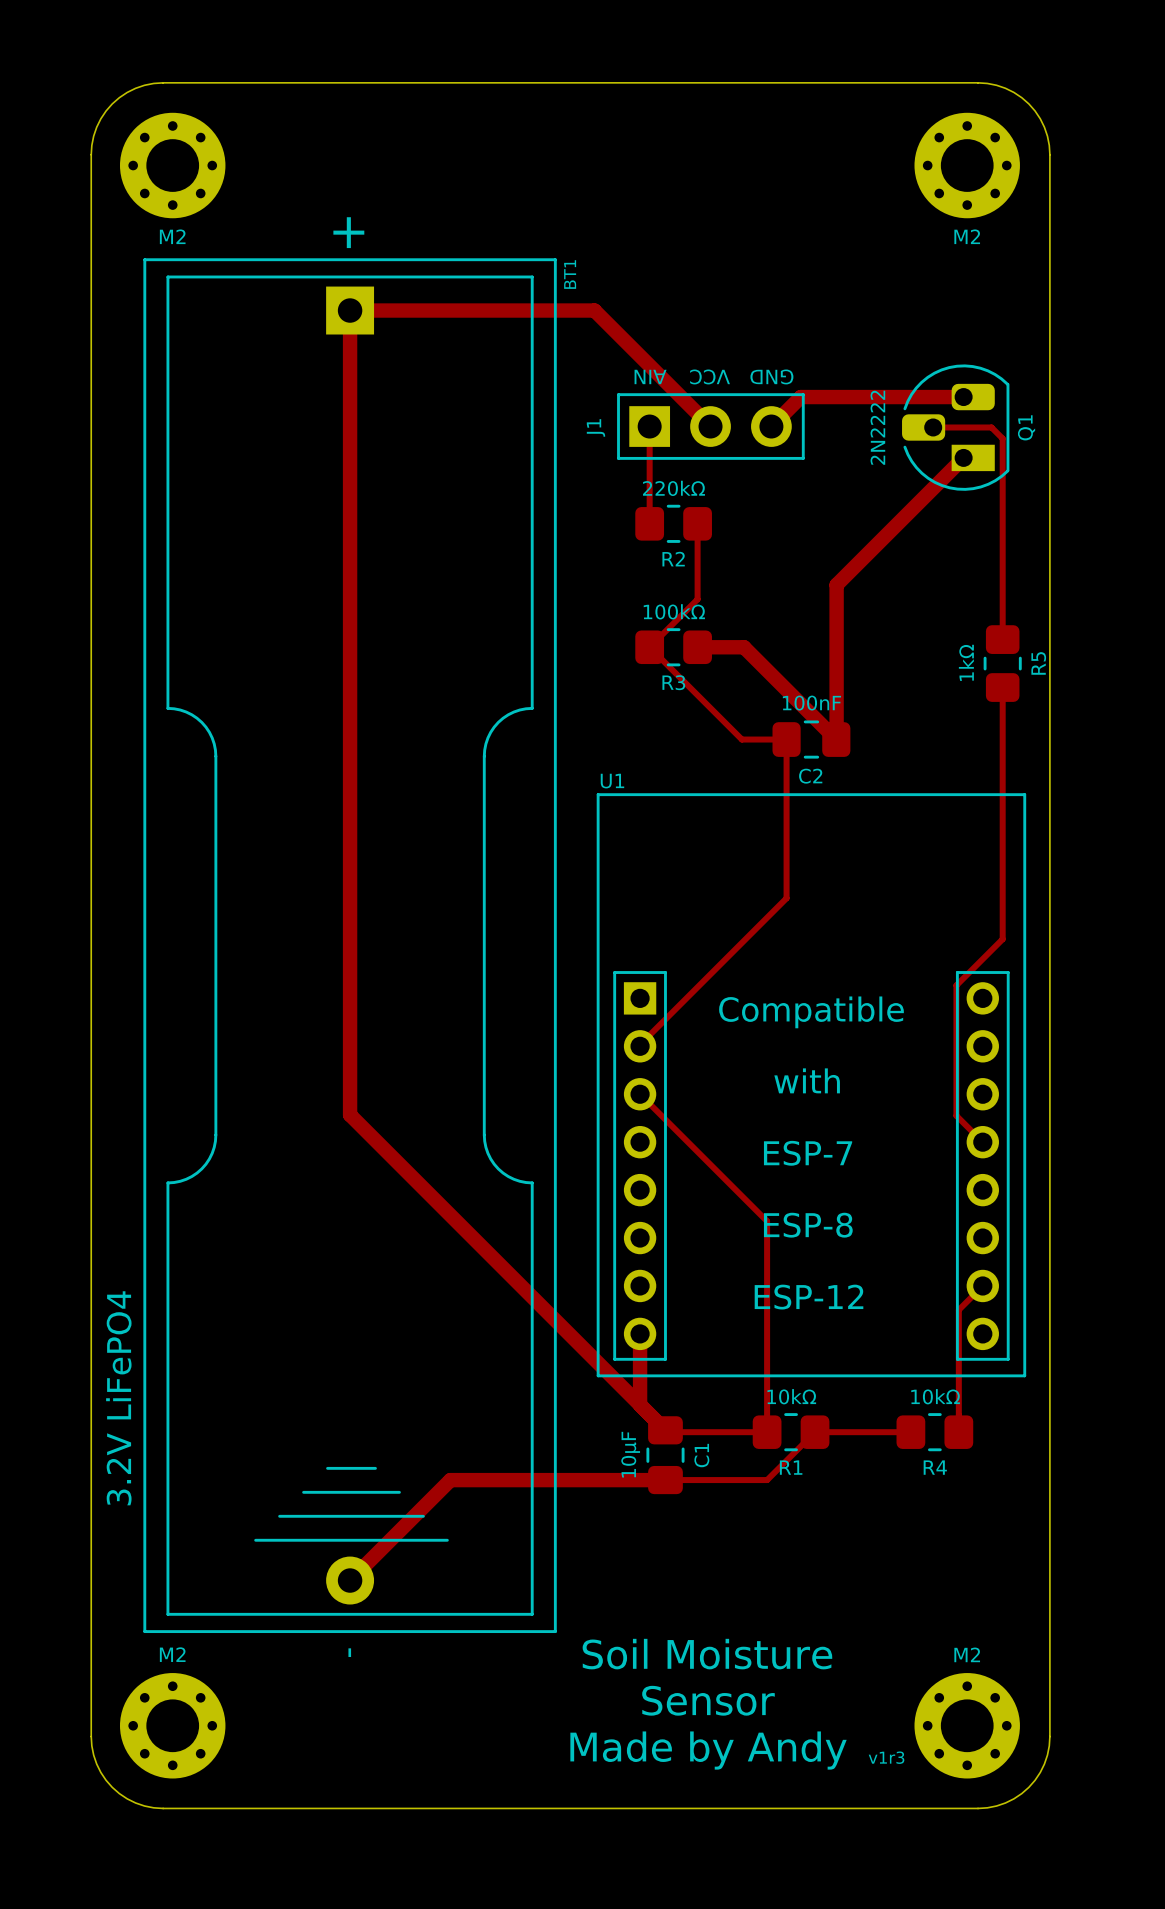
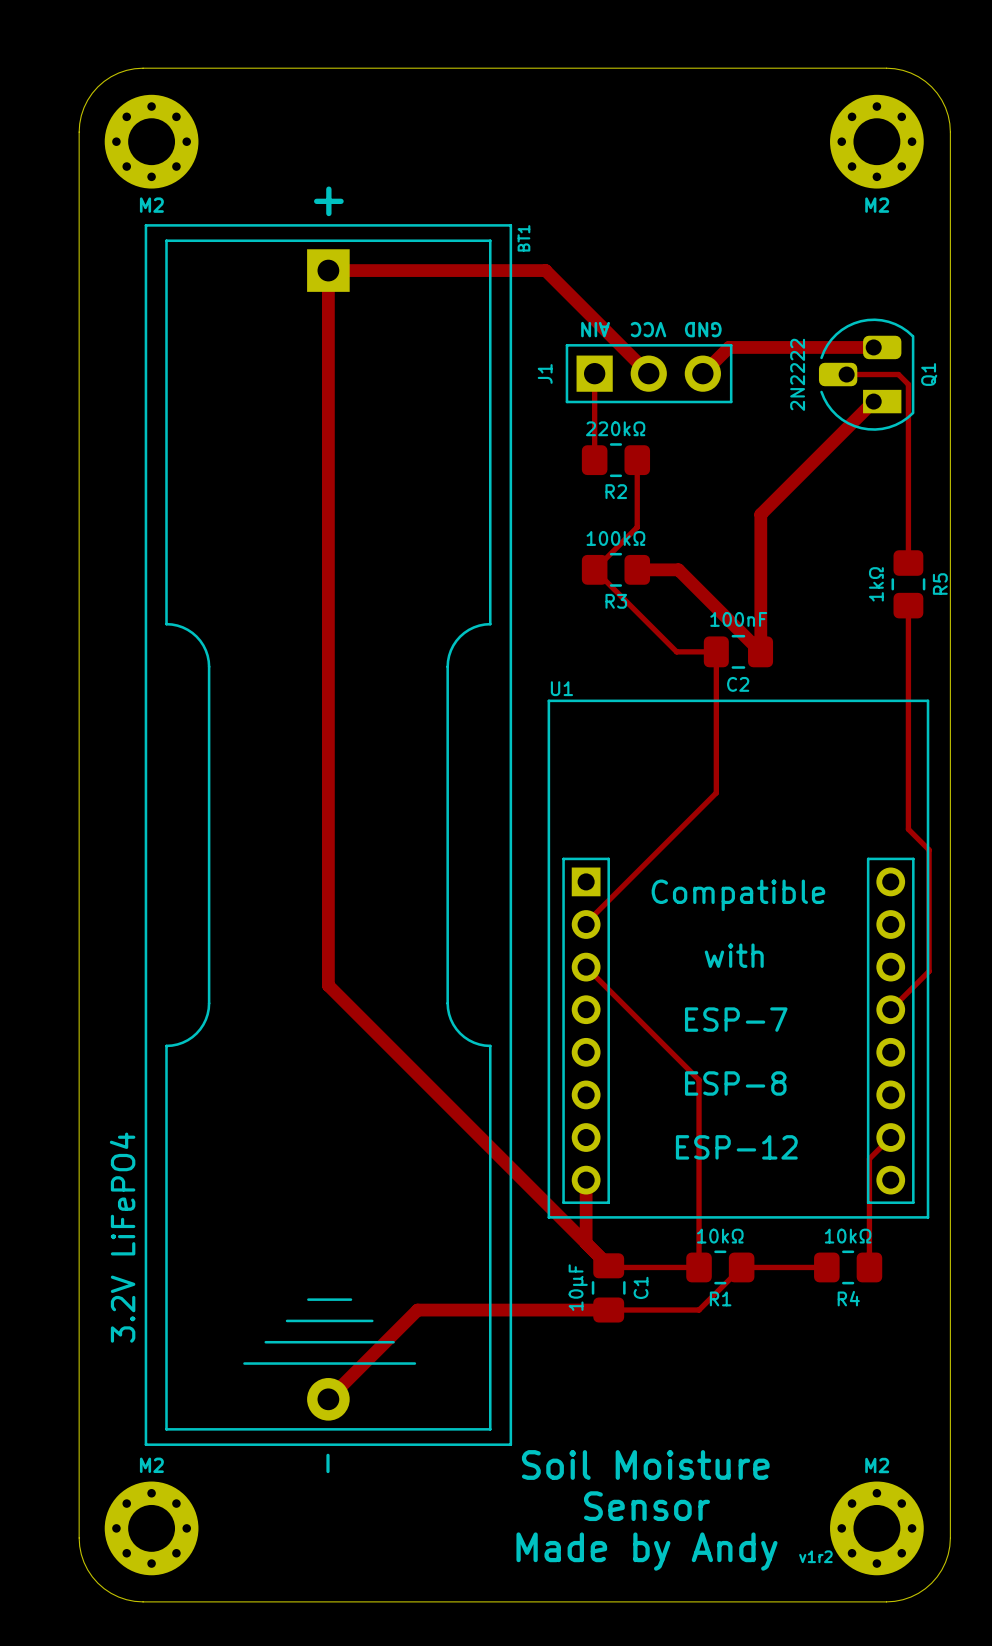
board edge: (163, 82) (135, 88) (112, 103) (96, 127) (91, 154) (91, 1736) (96, 1764) (112, 1787) (135, 1802) (163, 1808) -> (162, 68) (126, 70) (104, 81) (92, 93) (84, 107) (79, 132) (79, 1537) (84, 1562) (92, 1576) (104, 1588) (126, 1599) (162, 1601)
M2 position: (172, 165) -> (151, 141)
track: (1002, 939) (956, 985) (956, 1115) (982, 1142) -> (908, 829) (929, 849) (929, 971) (890, 1009)
M2 position: (172, 1725) -> (151, 1528)
text: v1r3 (886, 1757) -> v1r2 (815, 1556)

